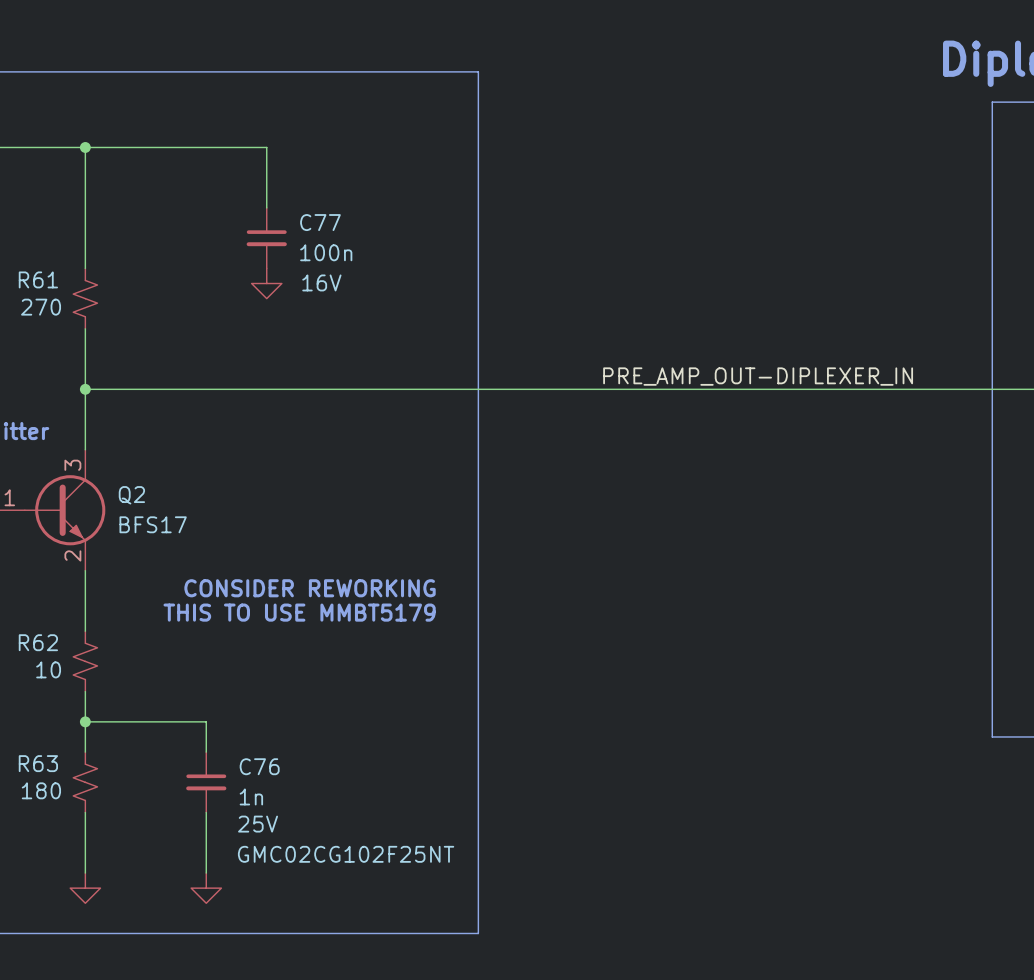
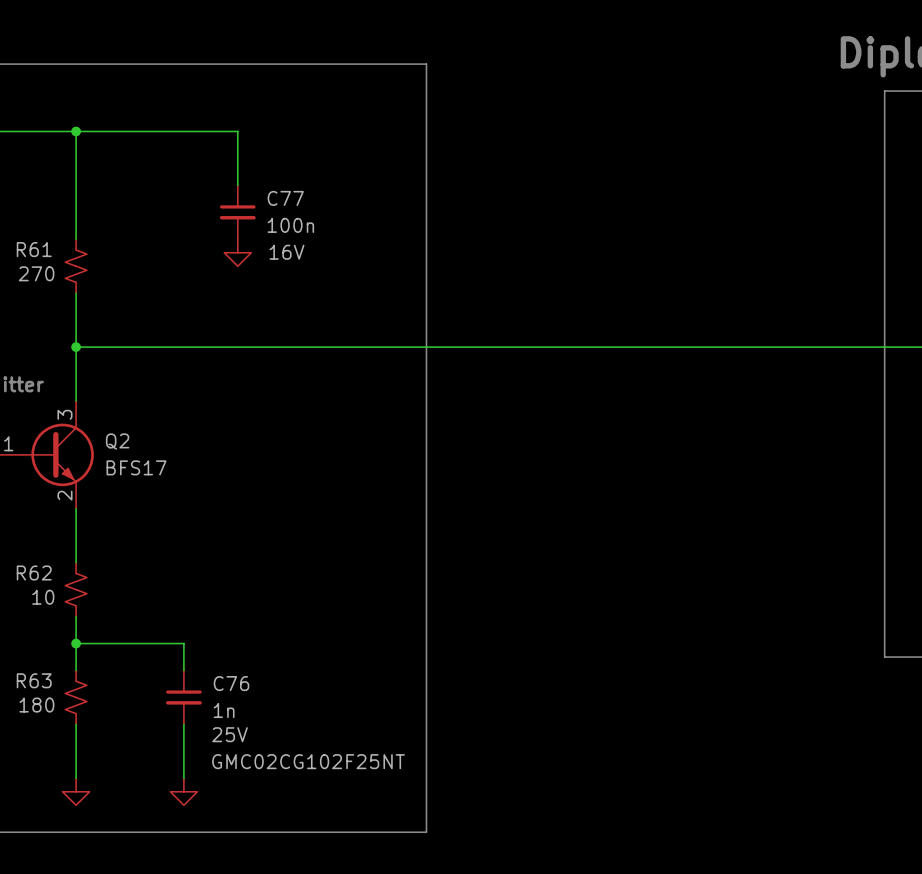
label: PRE_AMP_OUT-DIPLEXER_IN (758, 376) -> none
text: CONSIDER REWORKING (310, 588) -> none
text: THIS TO USE MMBT5179 (299, 612) -> none

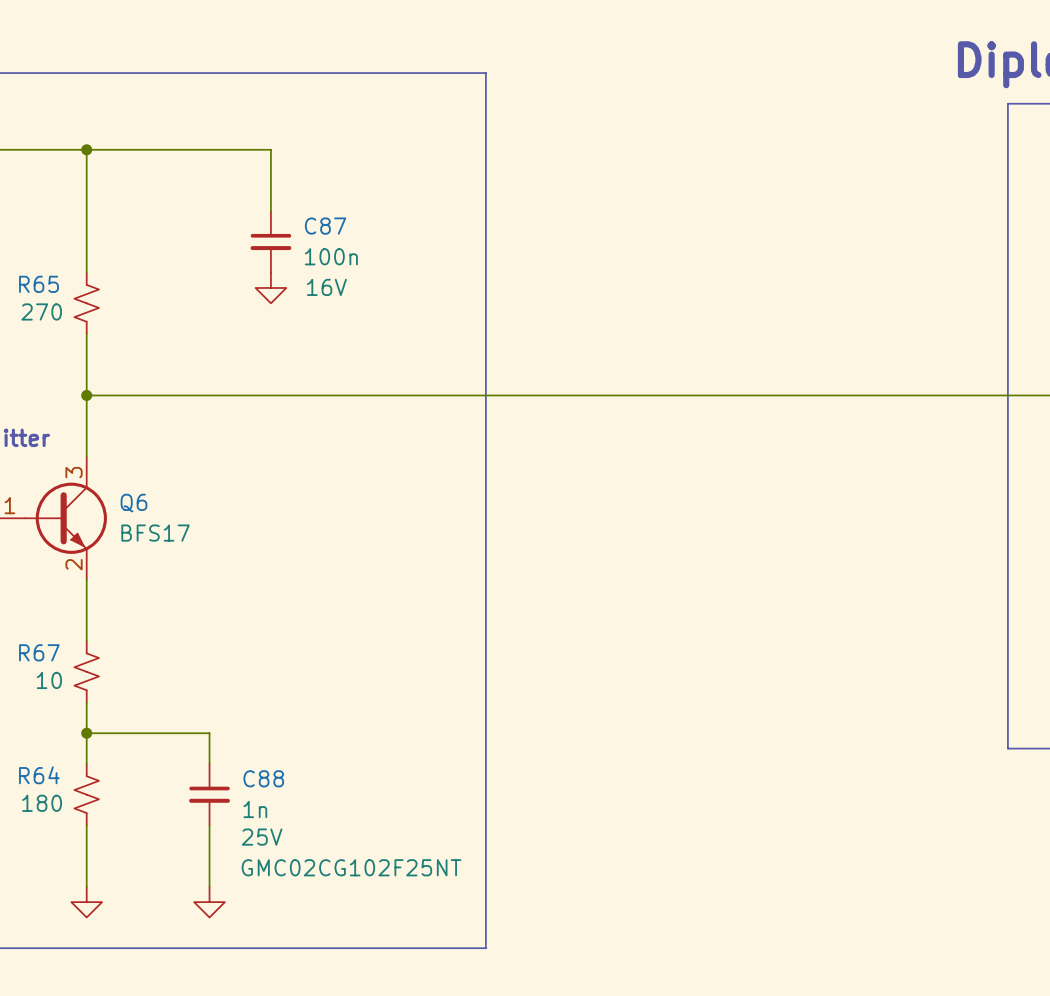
C77 name: C77 (285, 198) -> C87 (325, 226)
R61 name: R61 (34, 249) -> R65 (38, 284)
Q2 name: Q2 (117, 441) -> Q6 (133, 503)
R62 name: R62 (34, 572) -> R67 (39, 652)
R63 name: R63 (34, 680) -> R64 (39, 775)
C76 name: C76 (231, 683) -> C88 (263, 778)

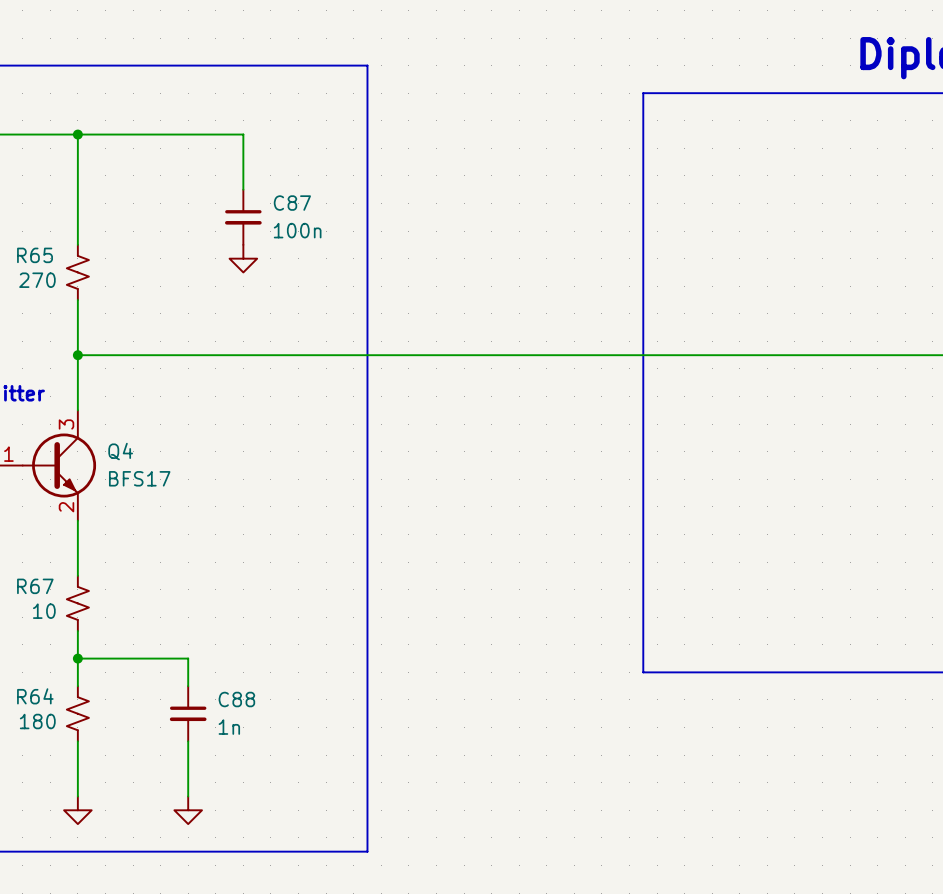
line: (409, 73) (485, 73) (485, 948) (409, 948) -> (367, 65) (367, 851)
line: (1007, 103) (1007, 748) -> (905, 93) (643, 93) (643, 672) (905, 672)
C87 text: 16V (326, 287) -> none
Q6 name: Q6 (133, 503) -> Q4 (120, 451)
C88 text: 25V (262, 837) -> none
C88 text: GMC02CG102F25NT (351, 867) -> none

